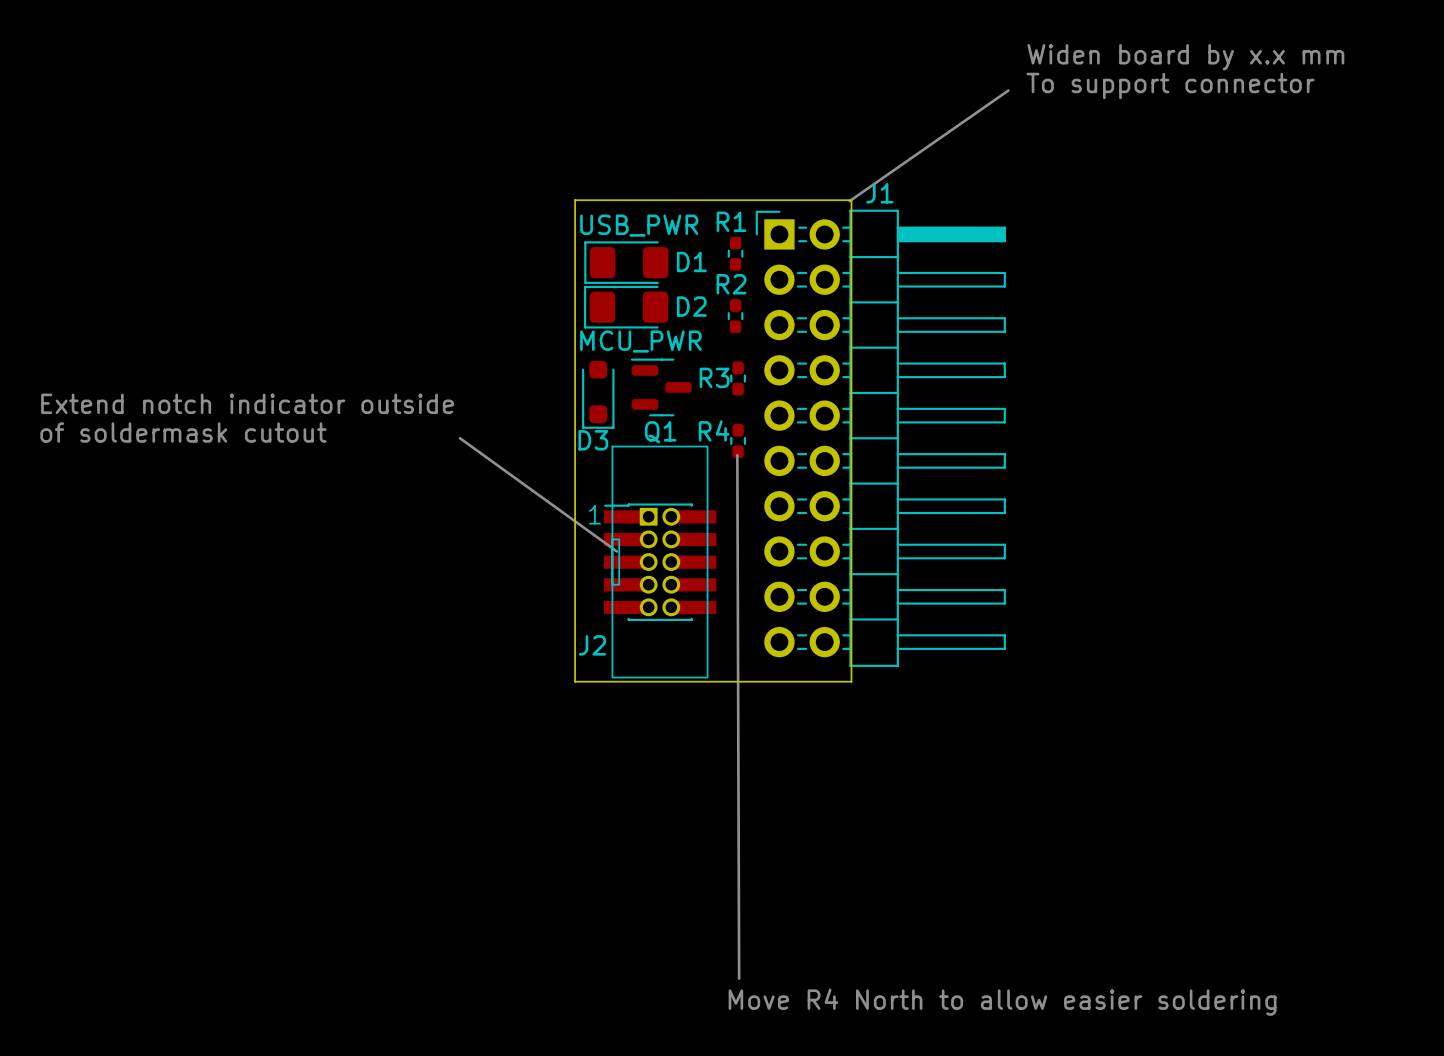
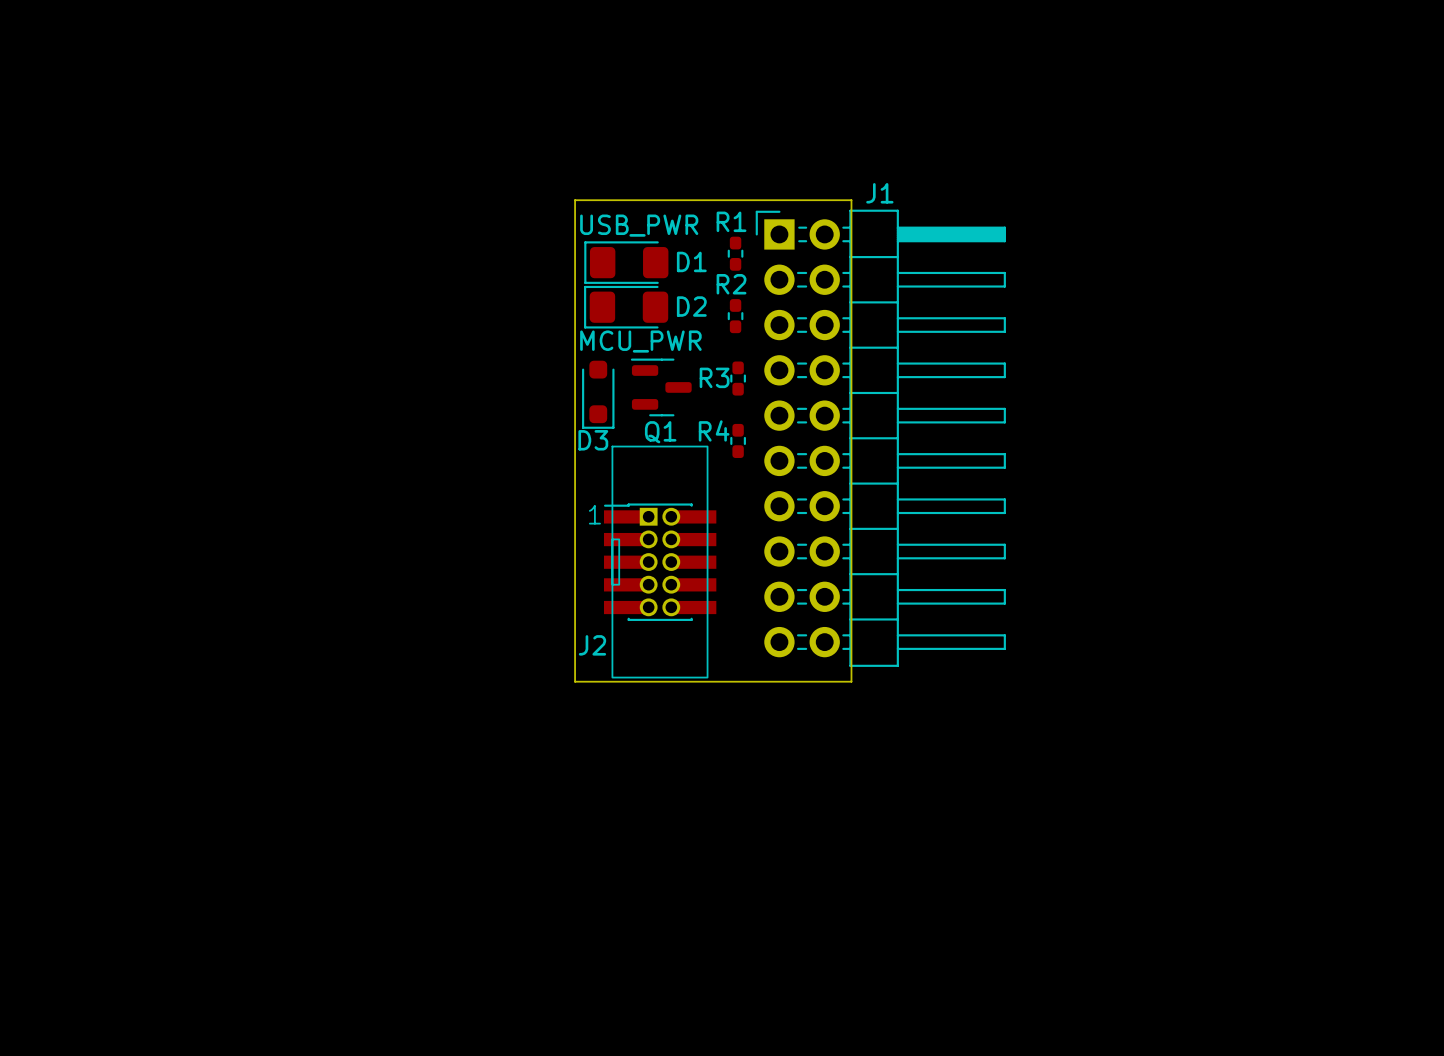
text: Widen board by x.x mm (1185, 57) -> none
text: To support connector (1170, 85) -> none
line: (1008, 90) (849, 201) -> none
text: Extend notch indicator outside (247, 403) -> none
text: of soldermask cutout (183, 432) -> none
line: (460, 438) (616, 551) -> none
line: (737, 455) (739, 978) -> none
text: Move R4 North to allow easier soldering (1002, 1002) -> none

